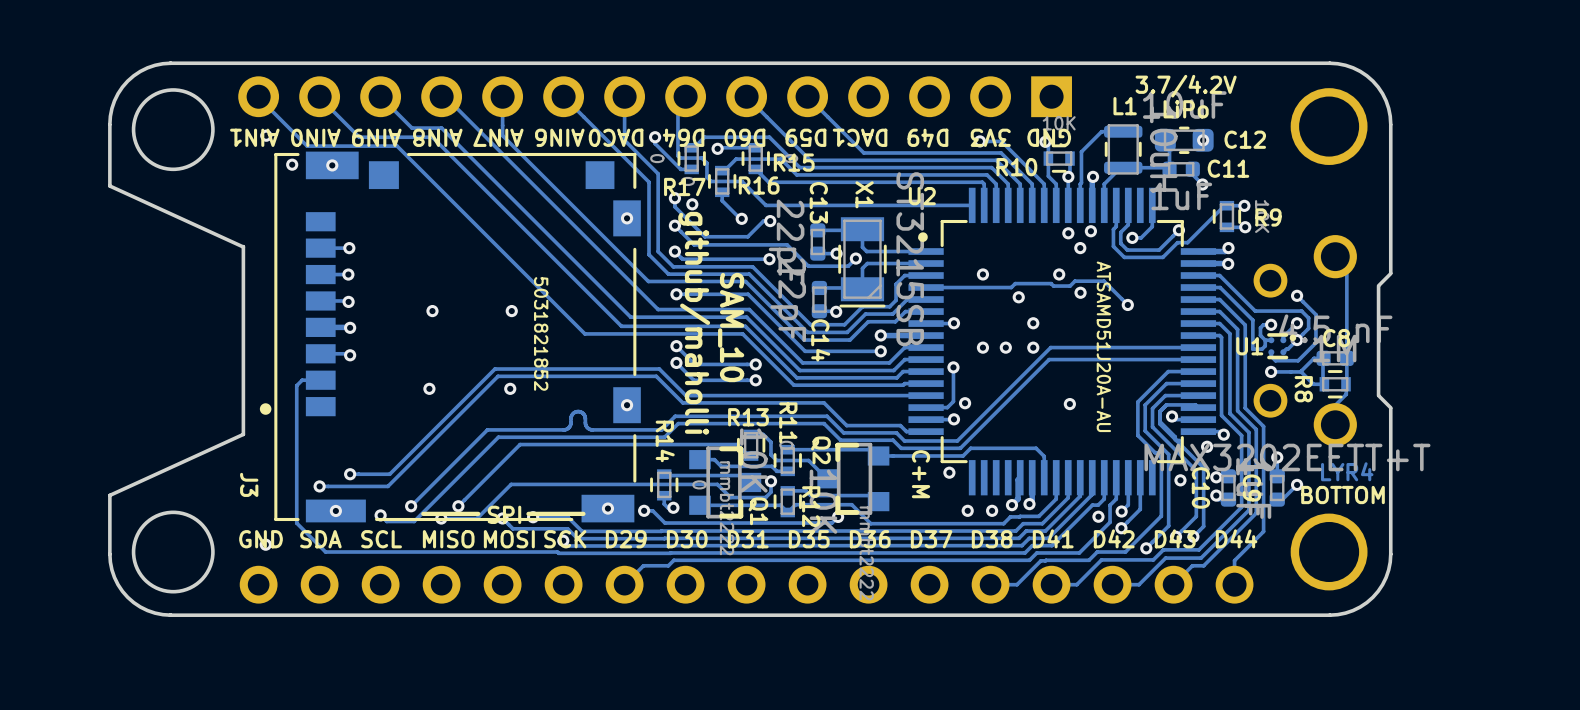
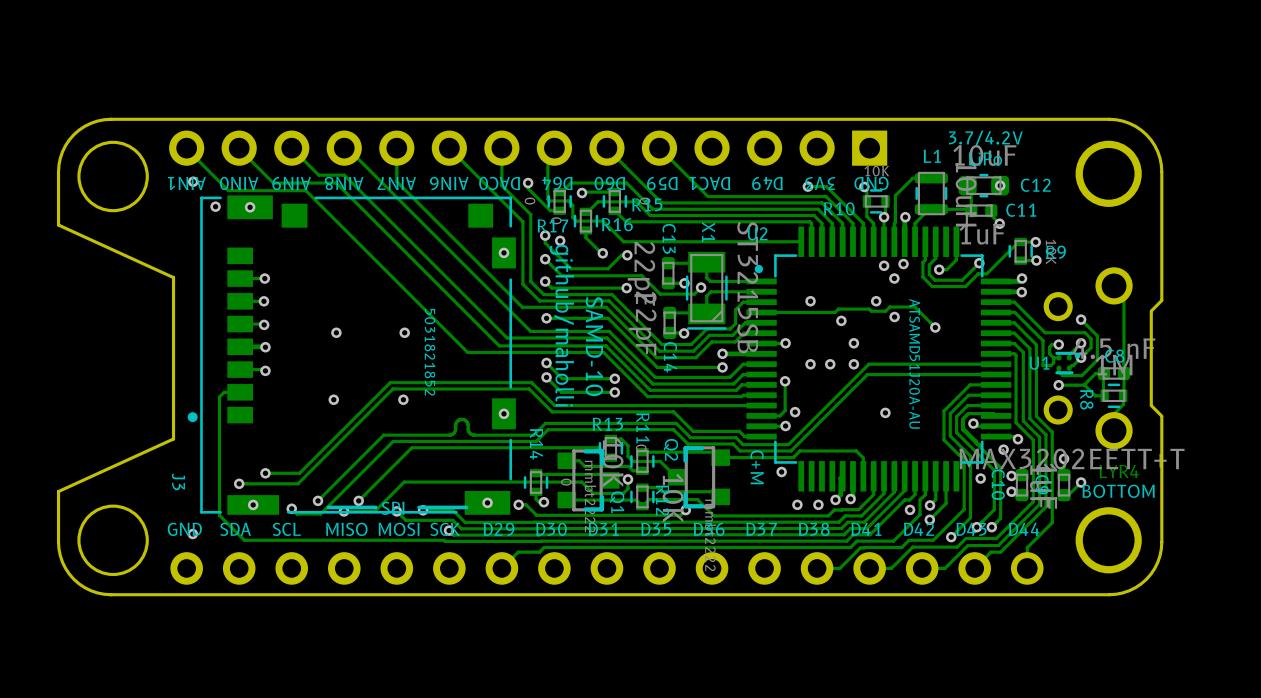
text: SAM_10 (731, 327) -> SAMD-10 (594, 346)

